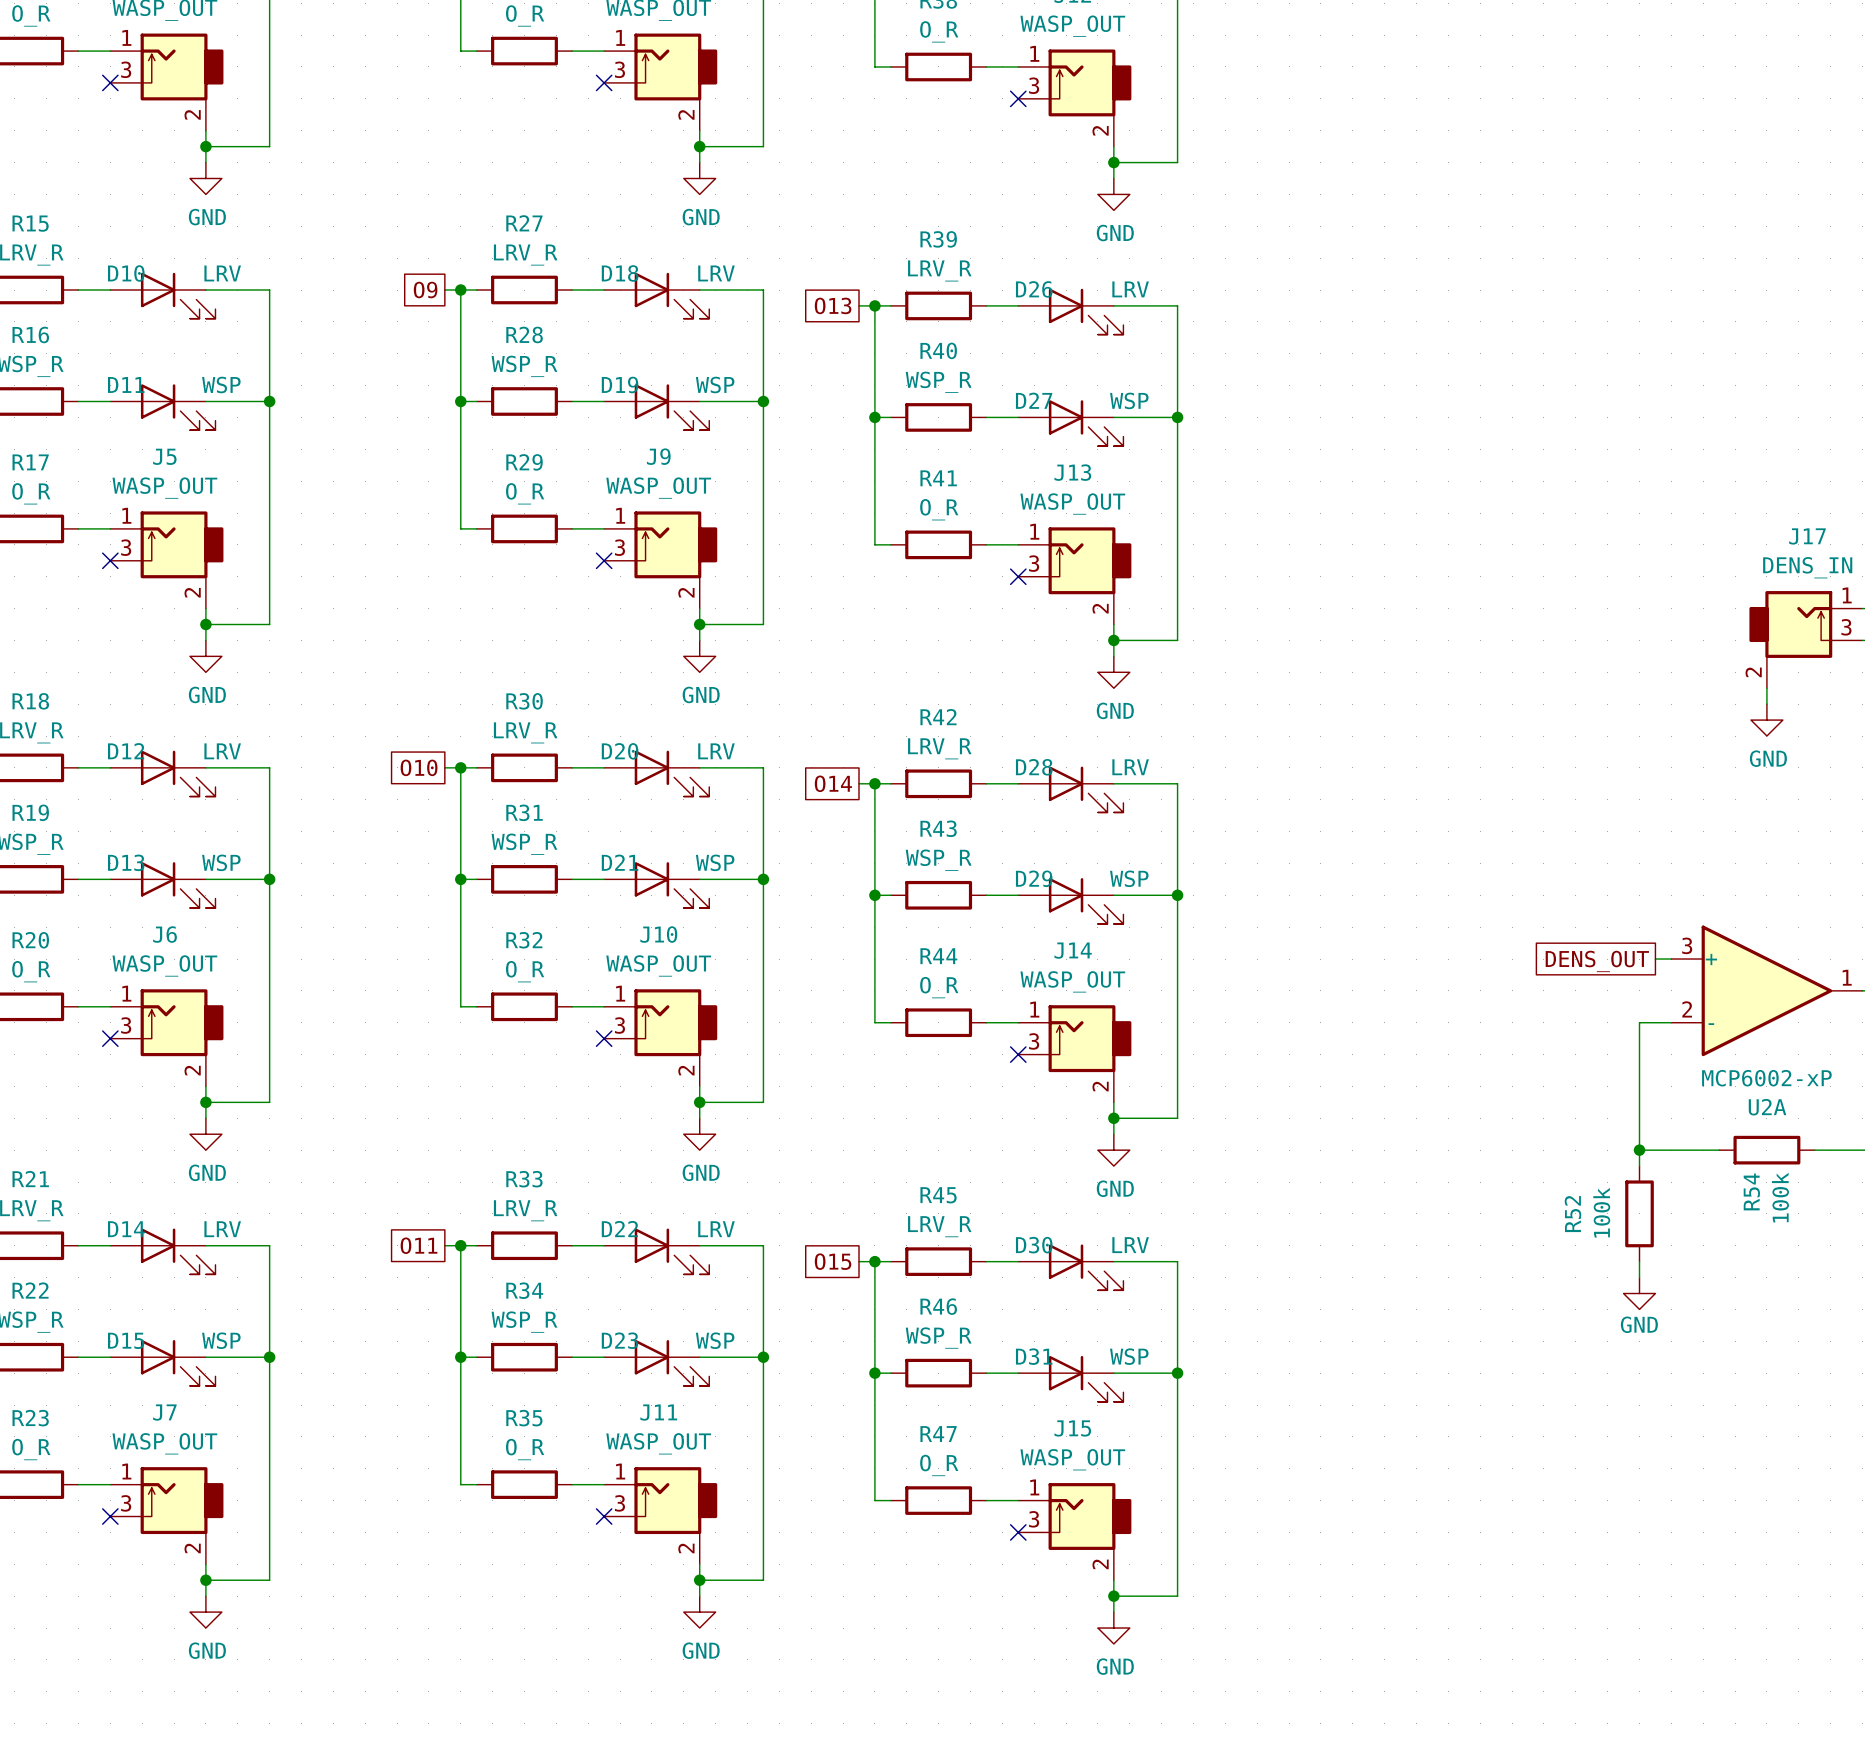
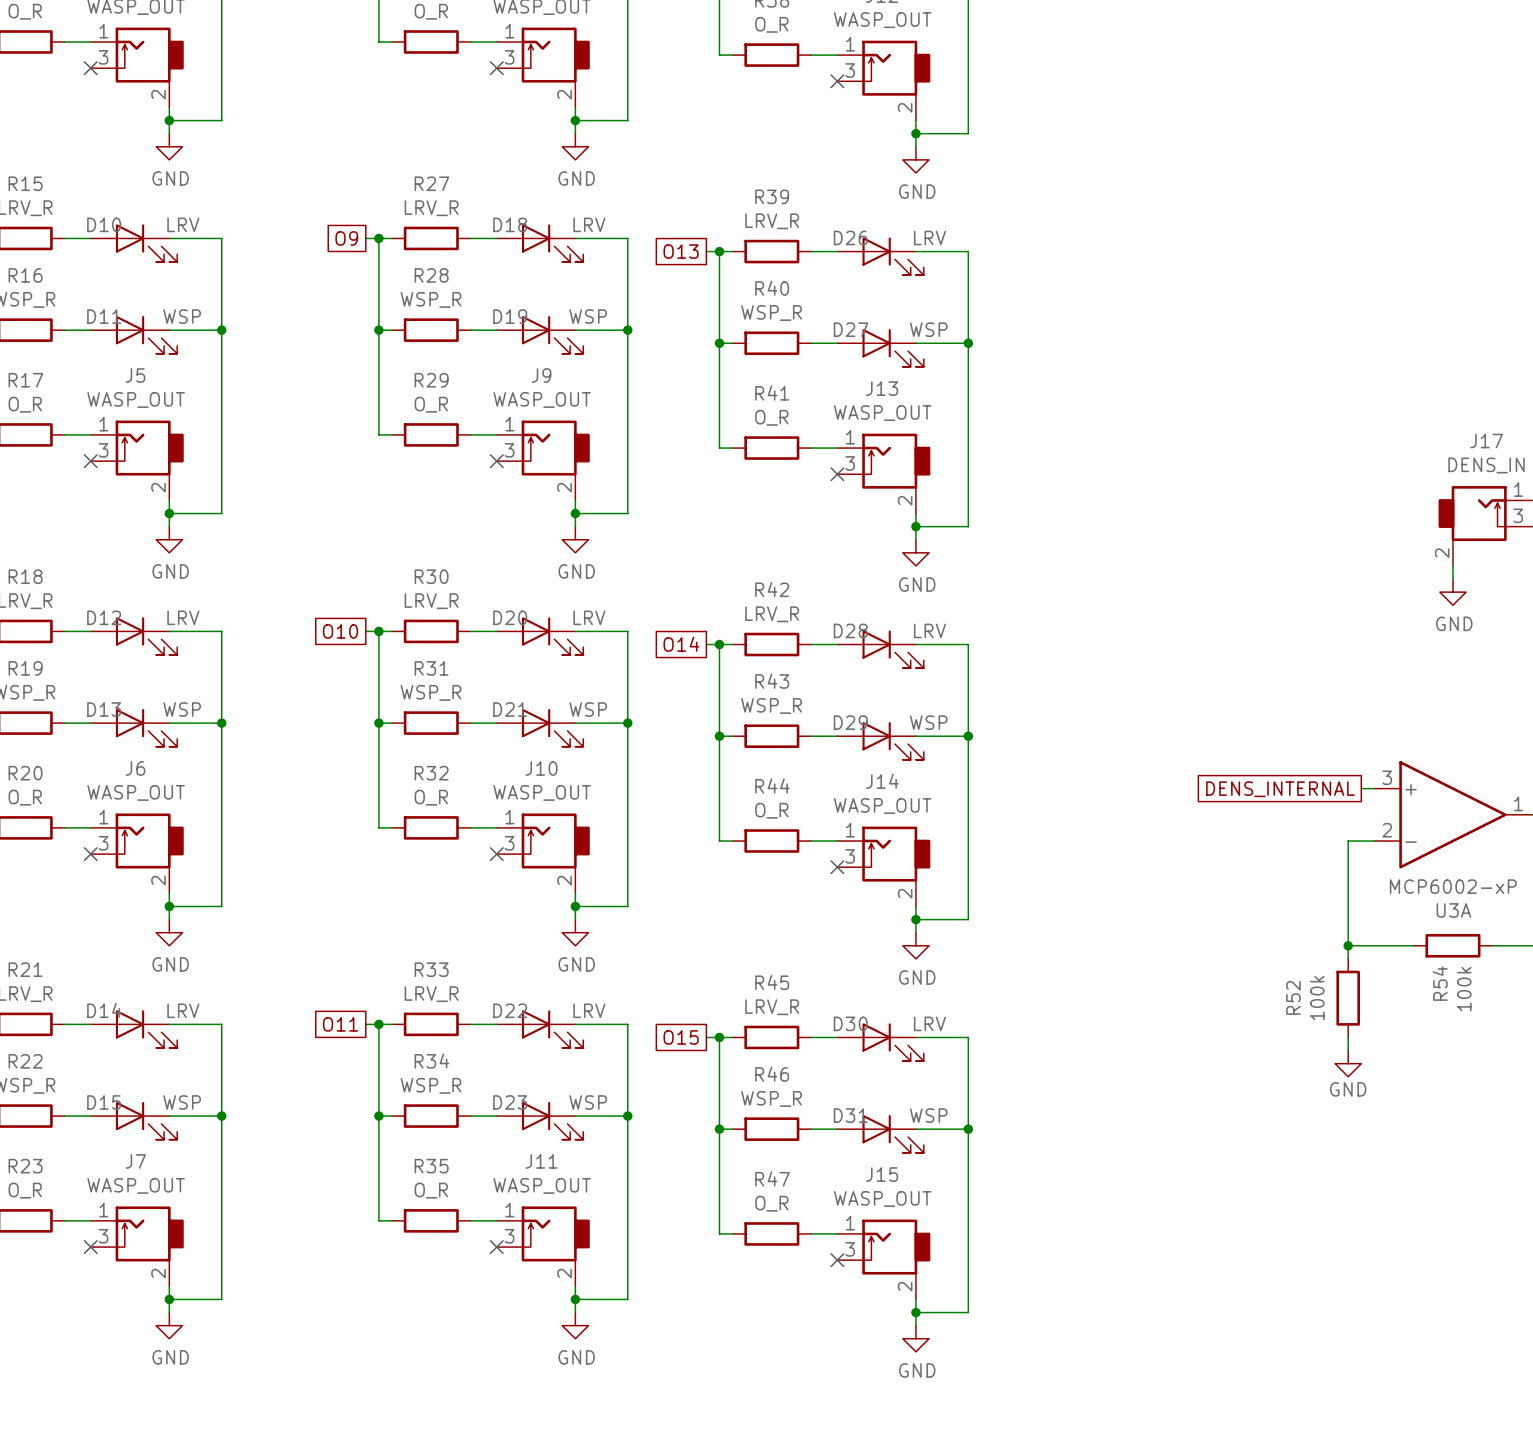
global label: DENS_OUT (1597, 961) -> DENS_INTERNAL (1280, 789)
U2A name: U2A (1767, 1107) -> U3A (1453, 910)

